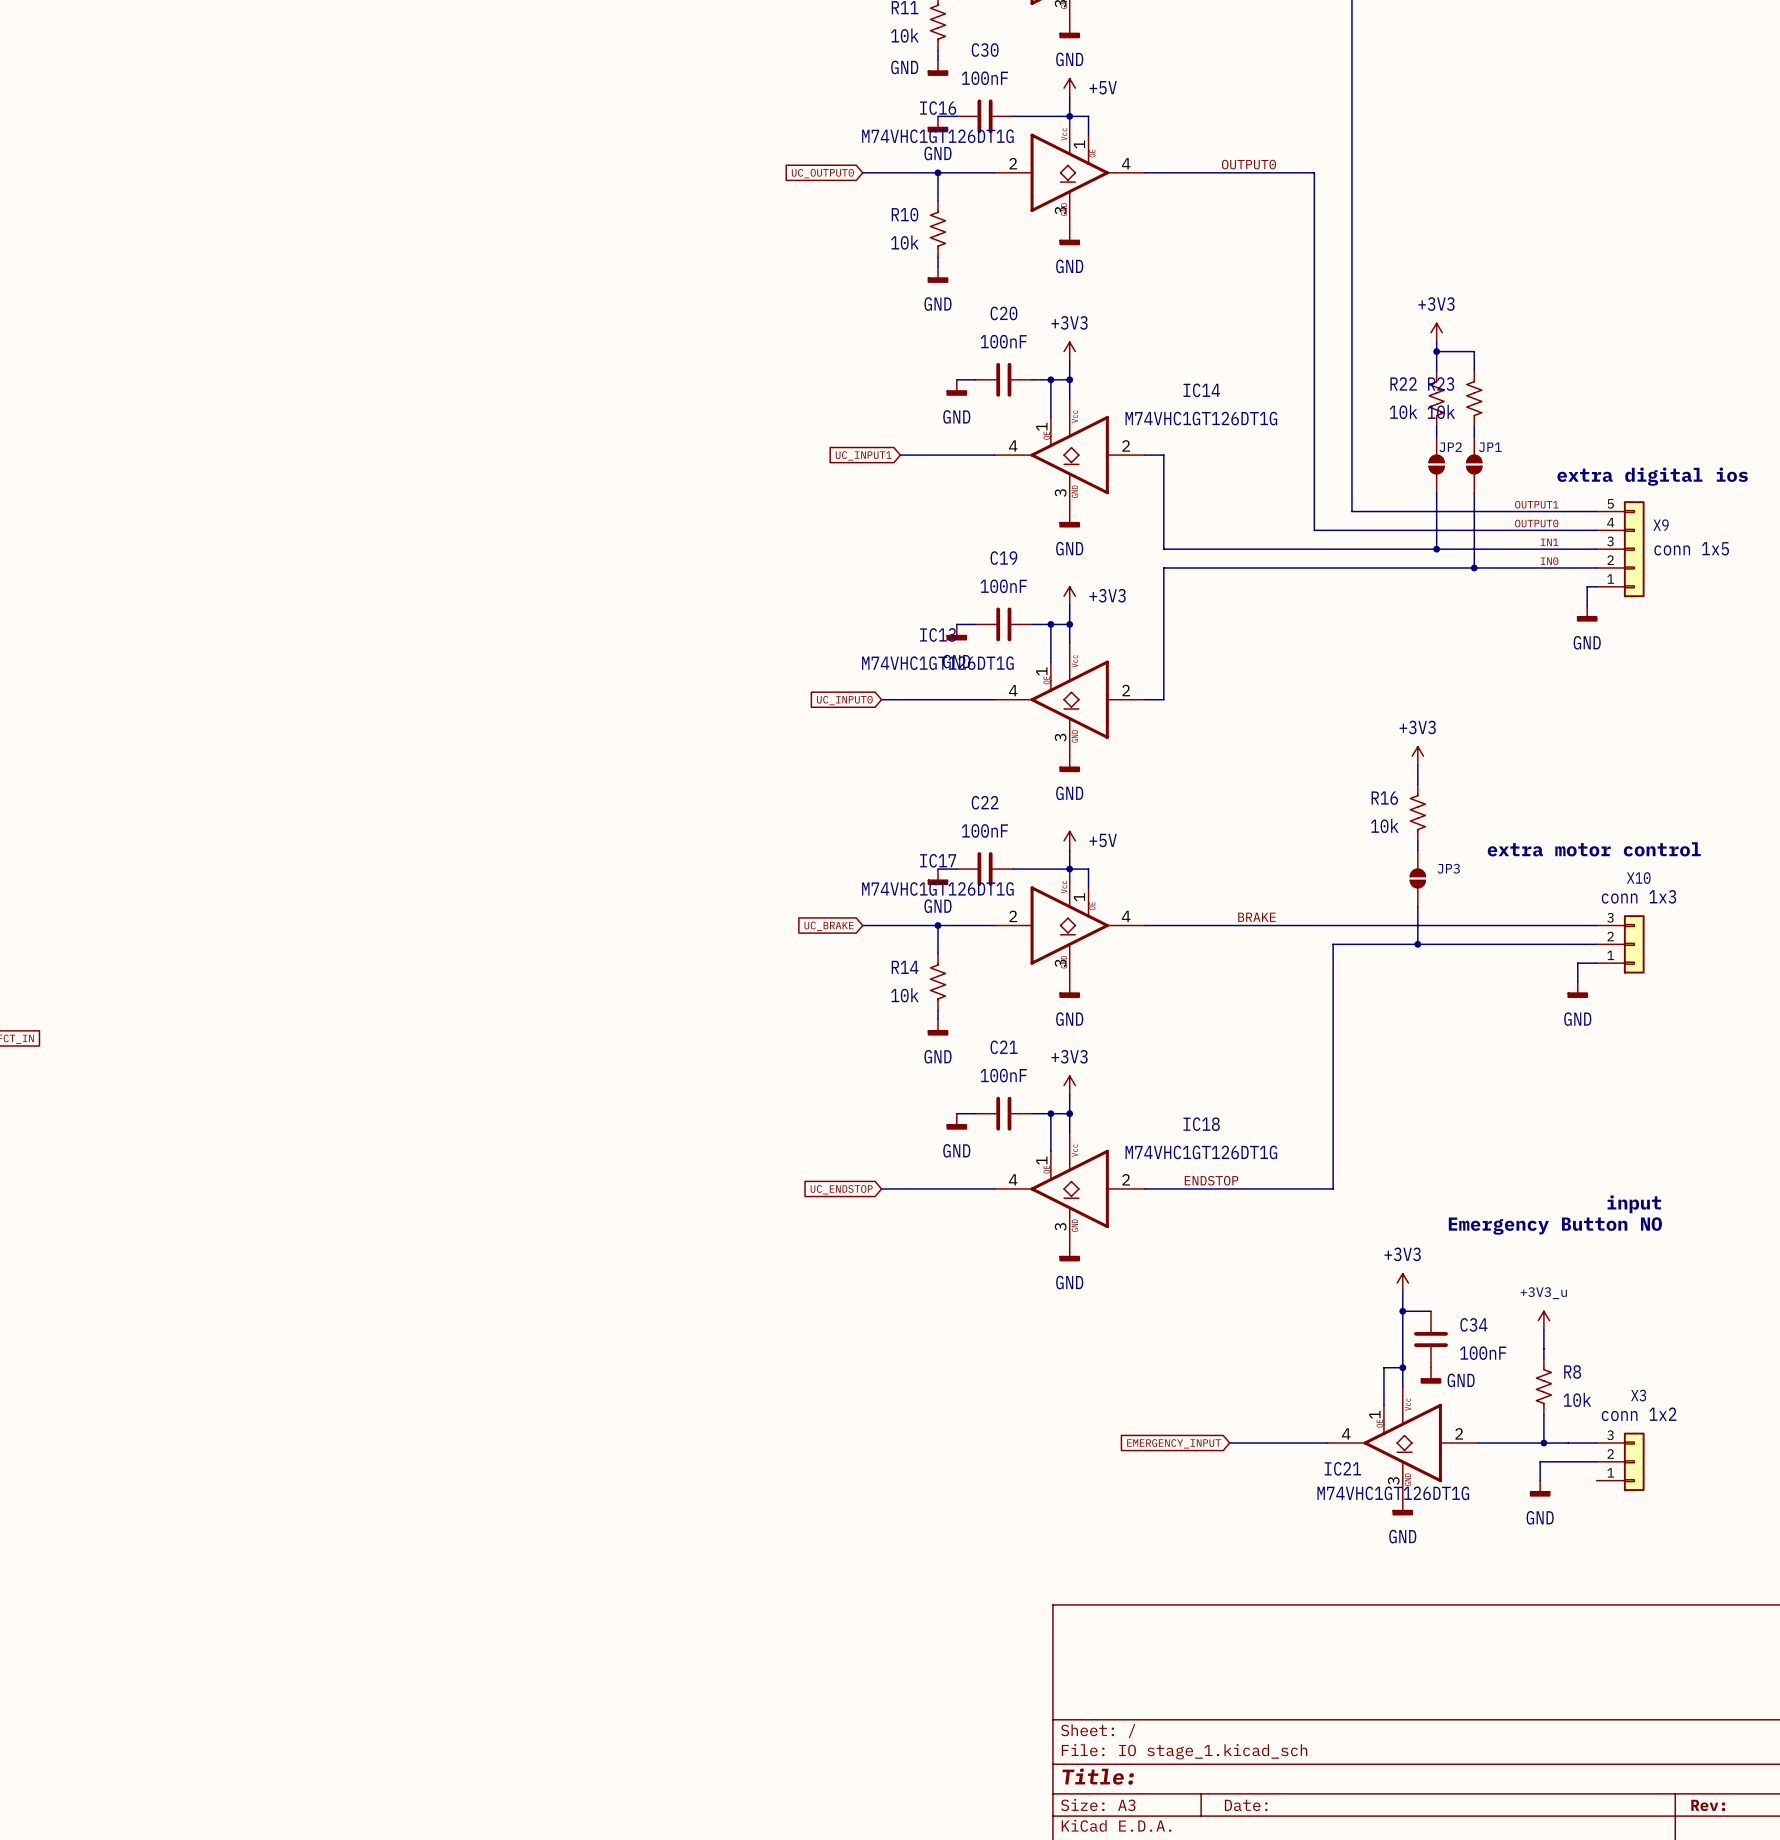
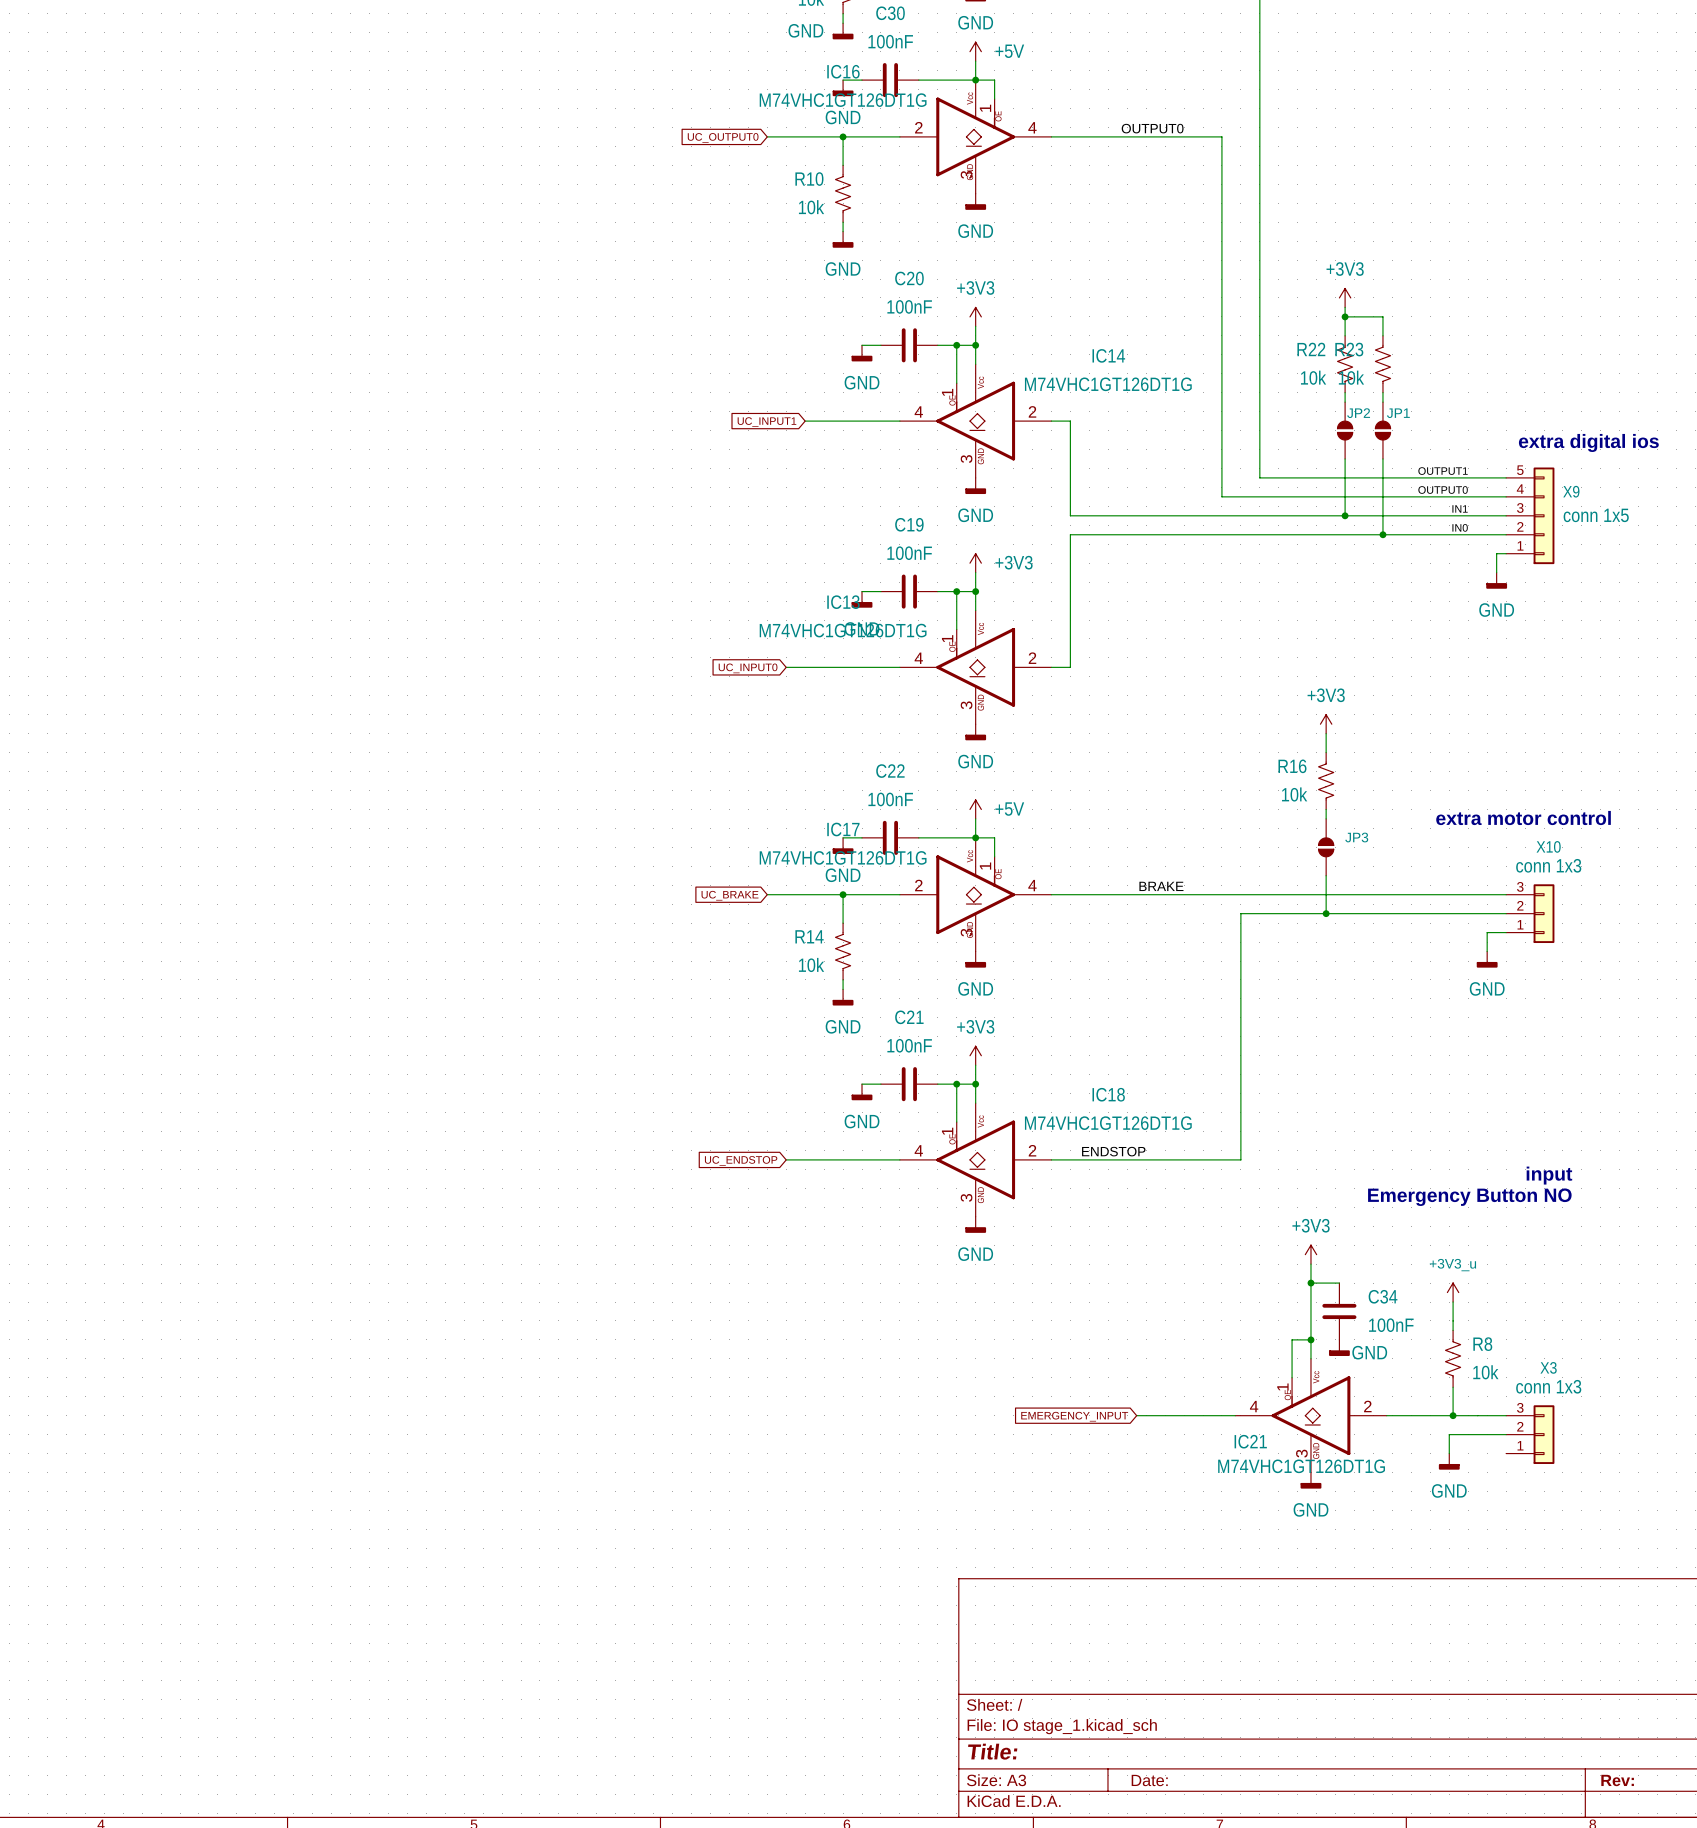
X3 value: conn 1x2 (1639, 1414) -> conn 1x3 (1548, 1386)

